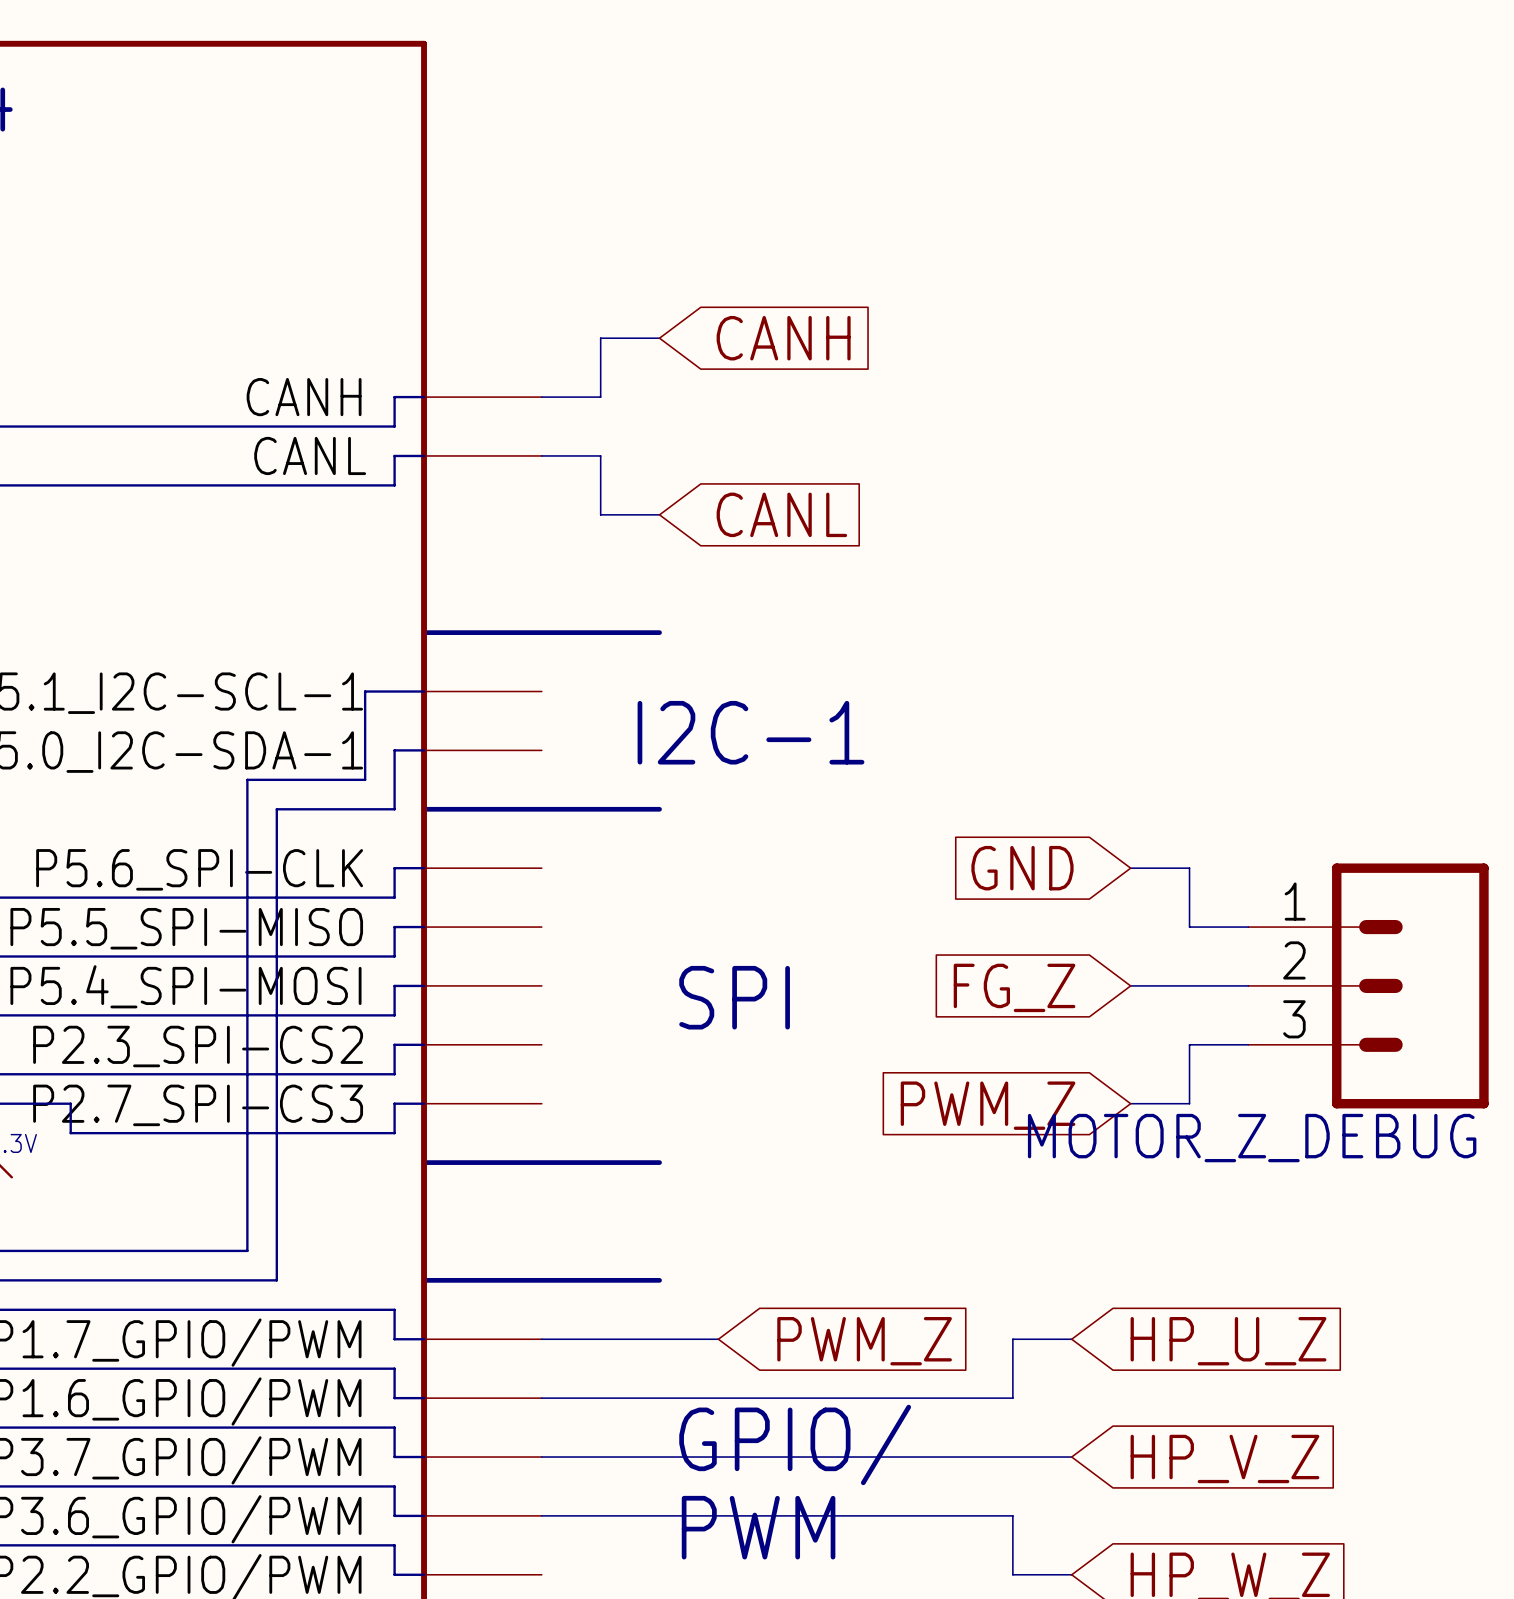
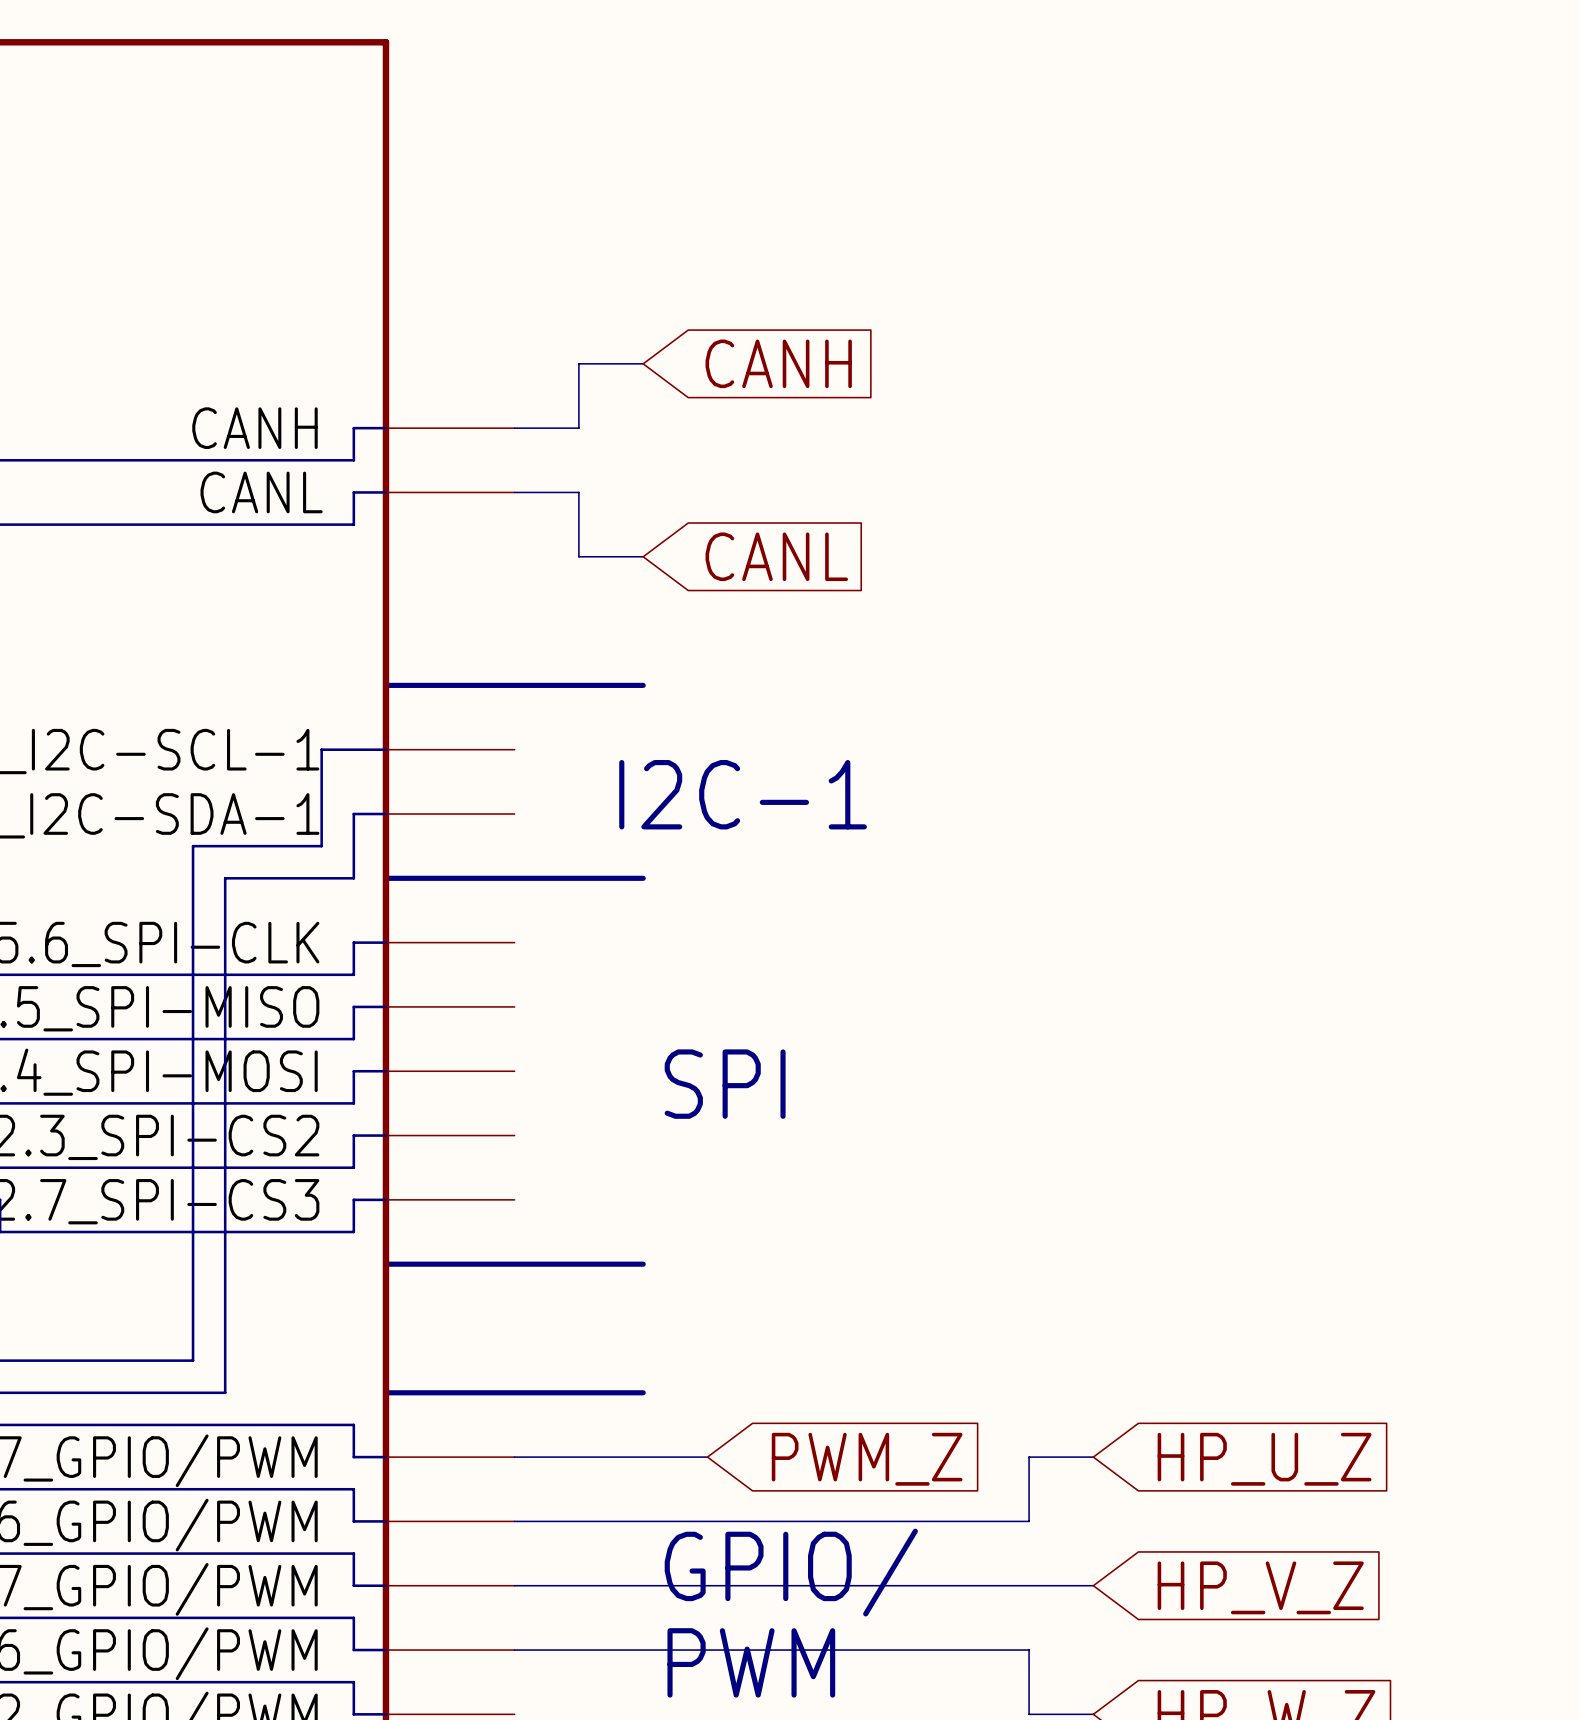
global label: GND (1022, 868) -> none
wire: (1130, 868) (1189, 868) (1189, 927) (1248, 927) -> none
wire: (1130, 985) (1248, 985) -> none
MOTOR_Z_DEBUG: (1368, 985) -> none
global label: FG_Z (1014, 987) -> none
wire: (1248, 1044) (1189, 1044) (1189, 1103) (1130, 1103) -> none
global label: PWM_Z (988, 1105) -> none

